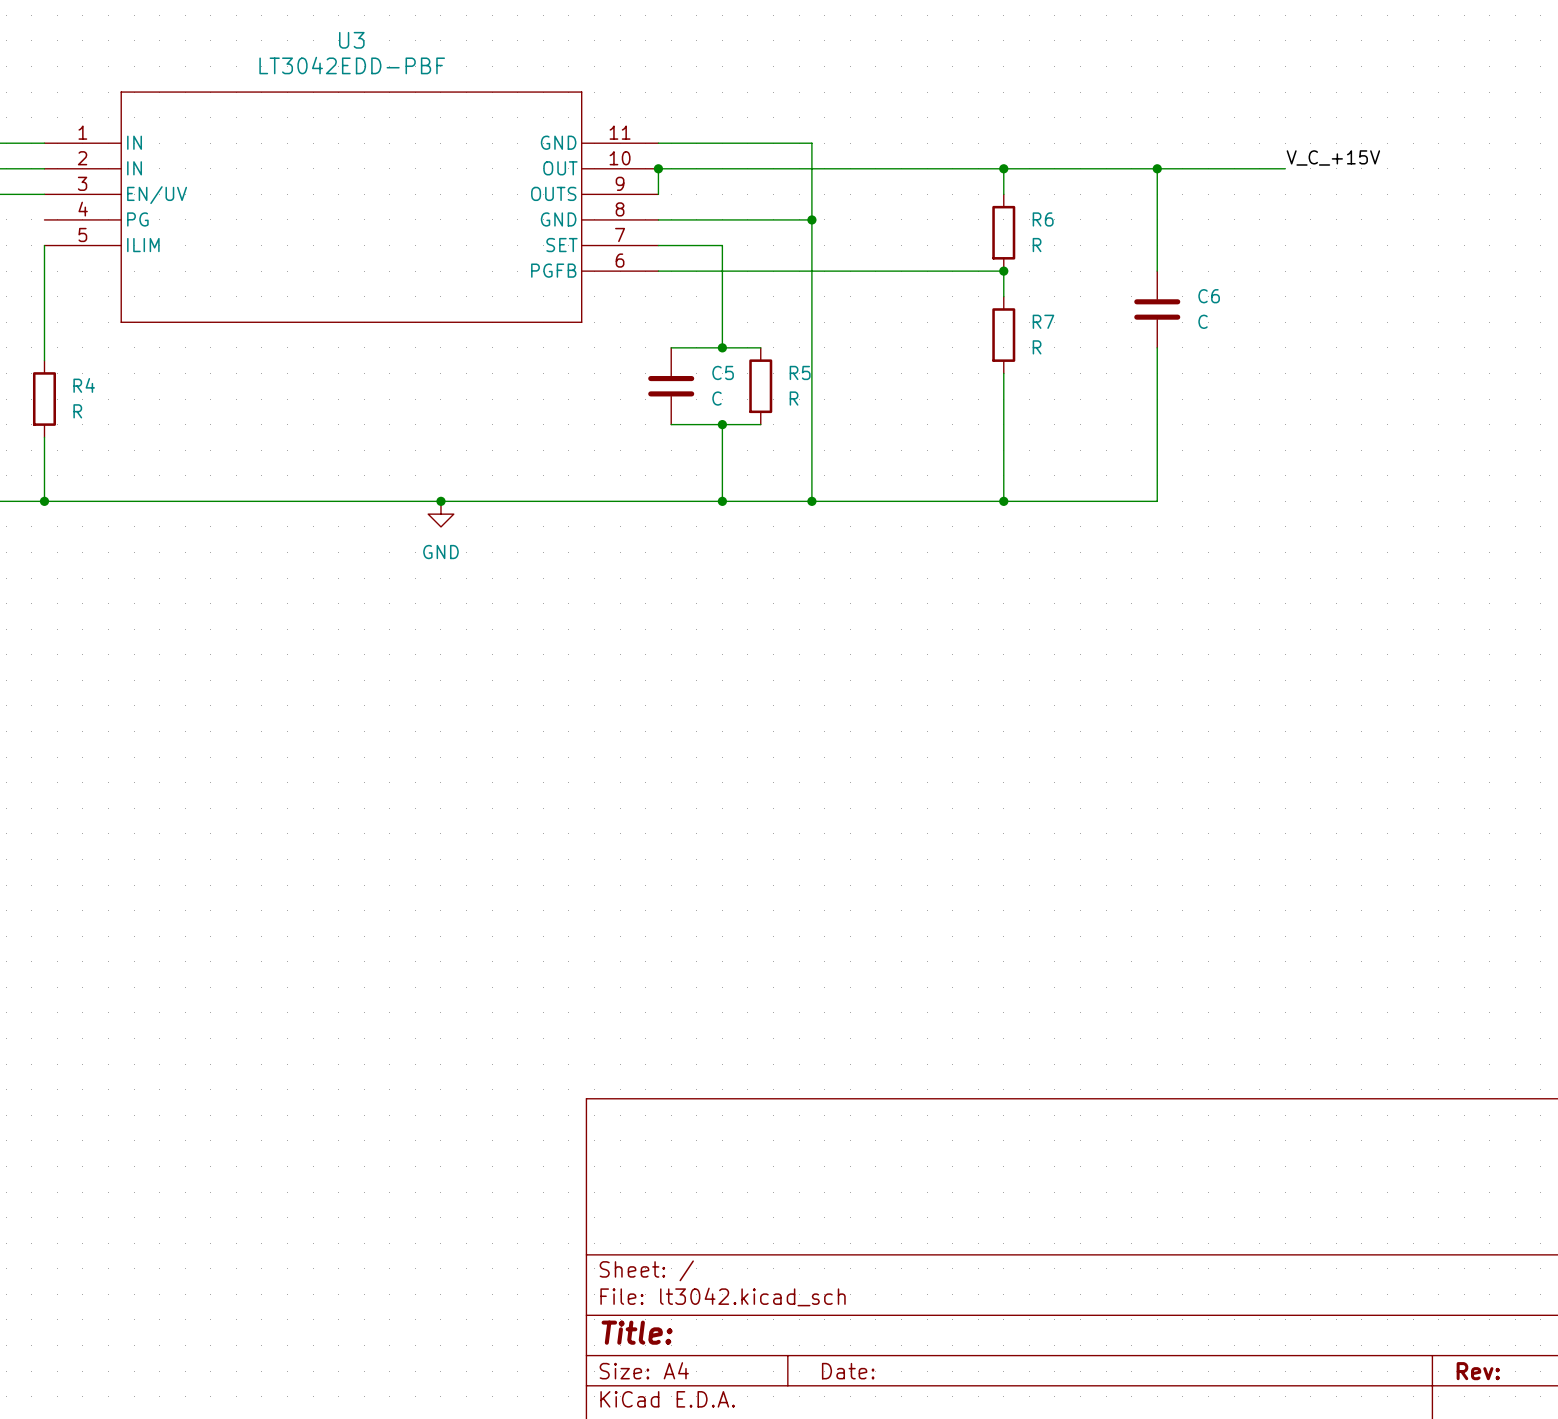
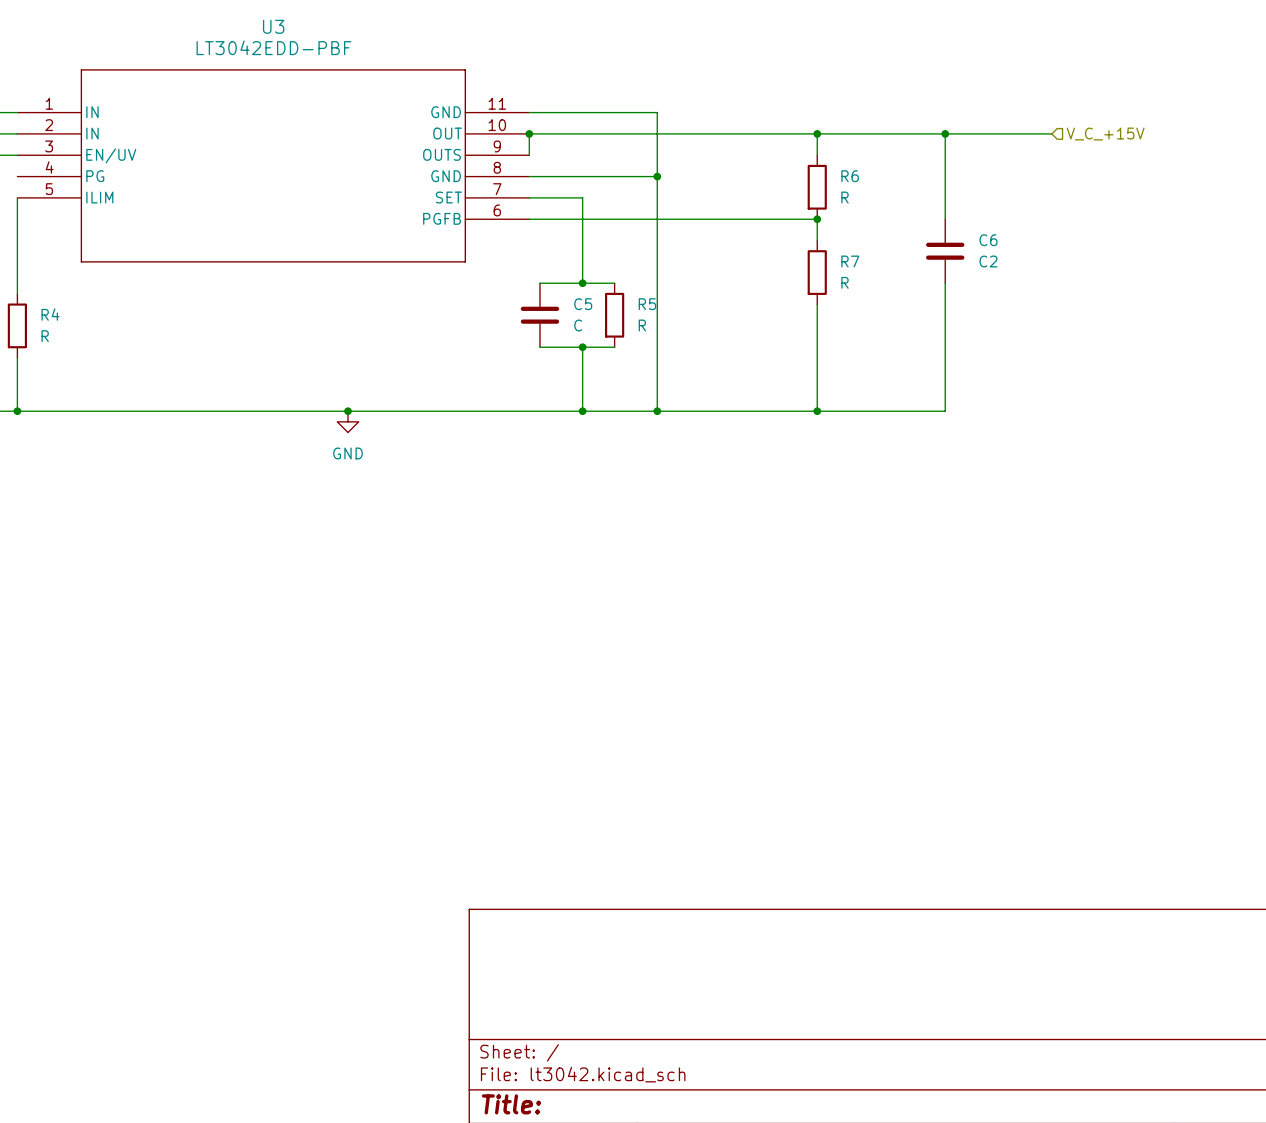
label: V_C_+15V (1333, 157) -> none
hierarchical label: none -> V_C_+15V (1105, 134)
C6 value: C (1203, 321) -> C2 (988, 261)

